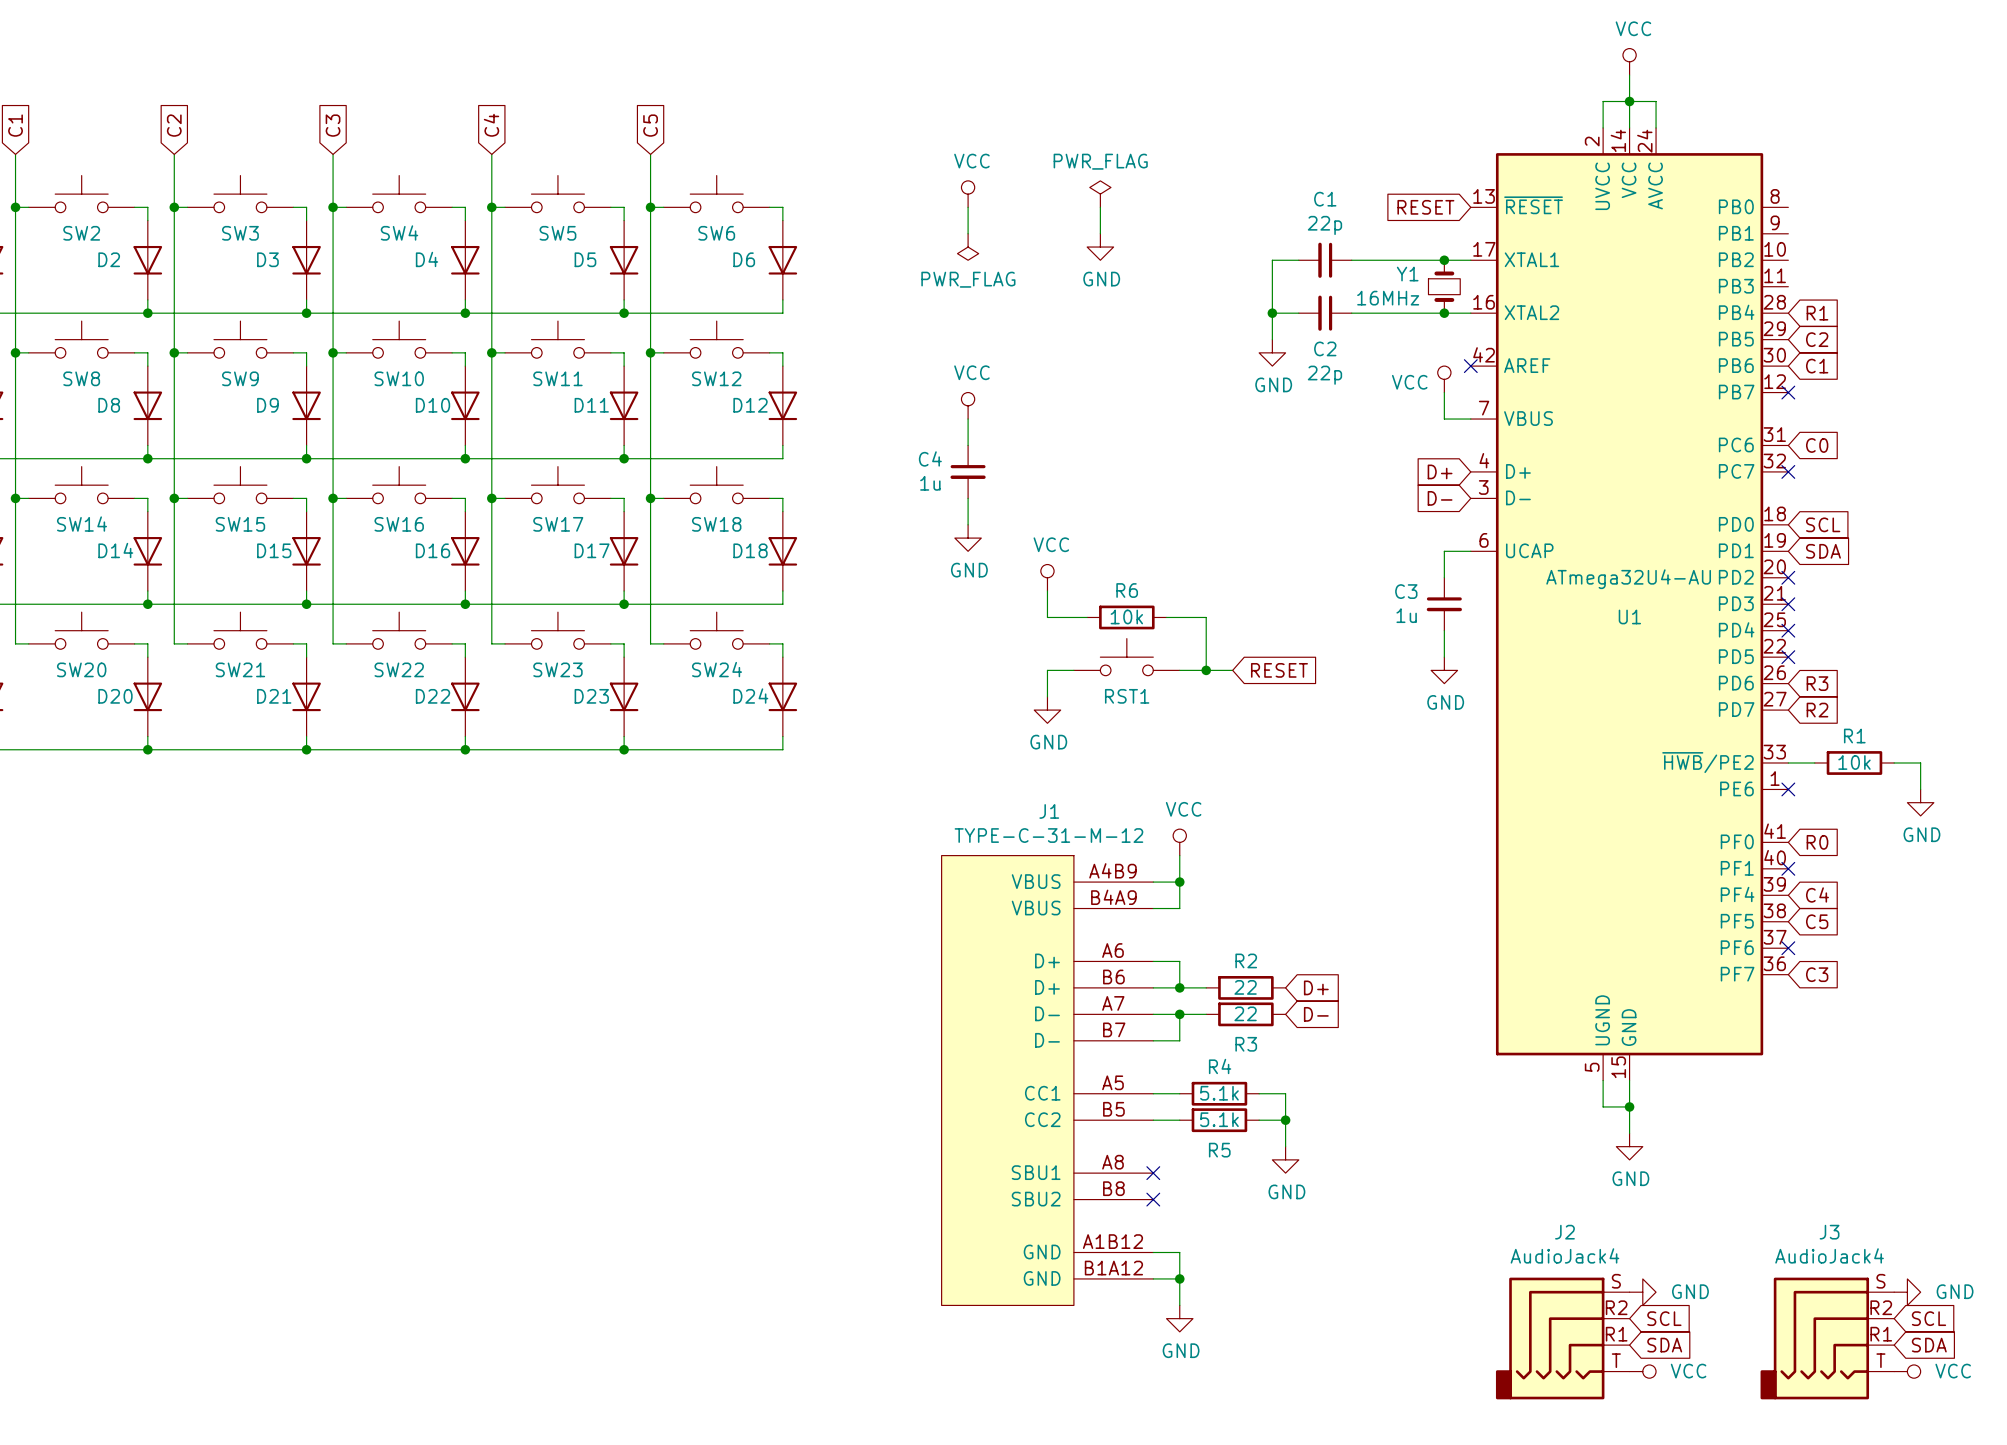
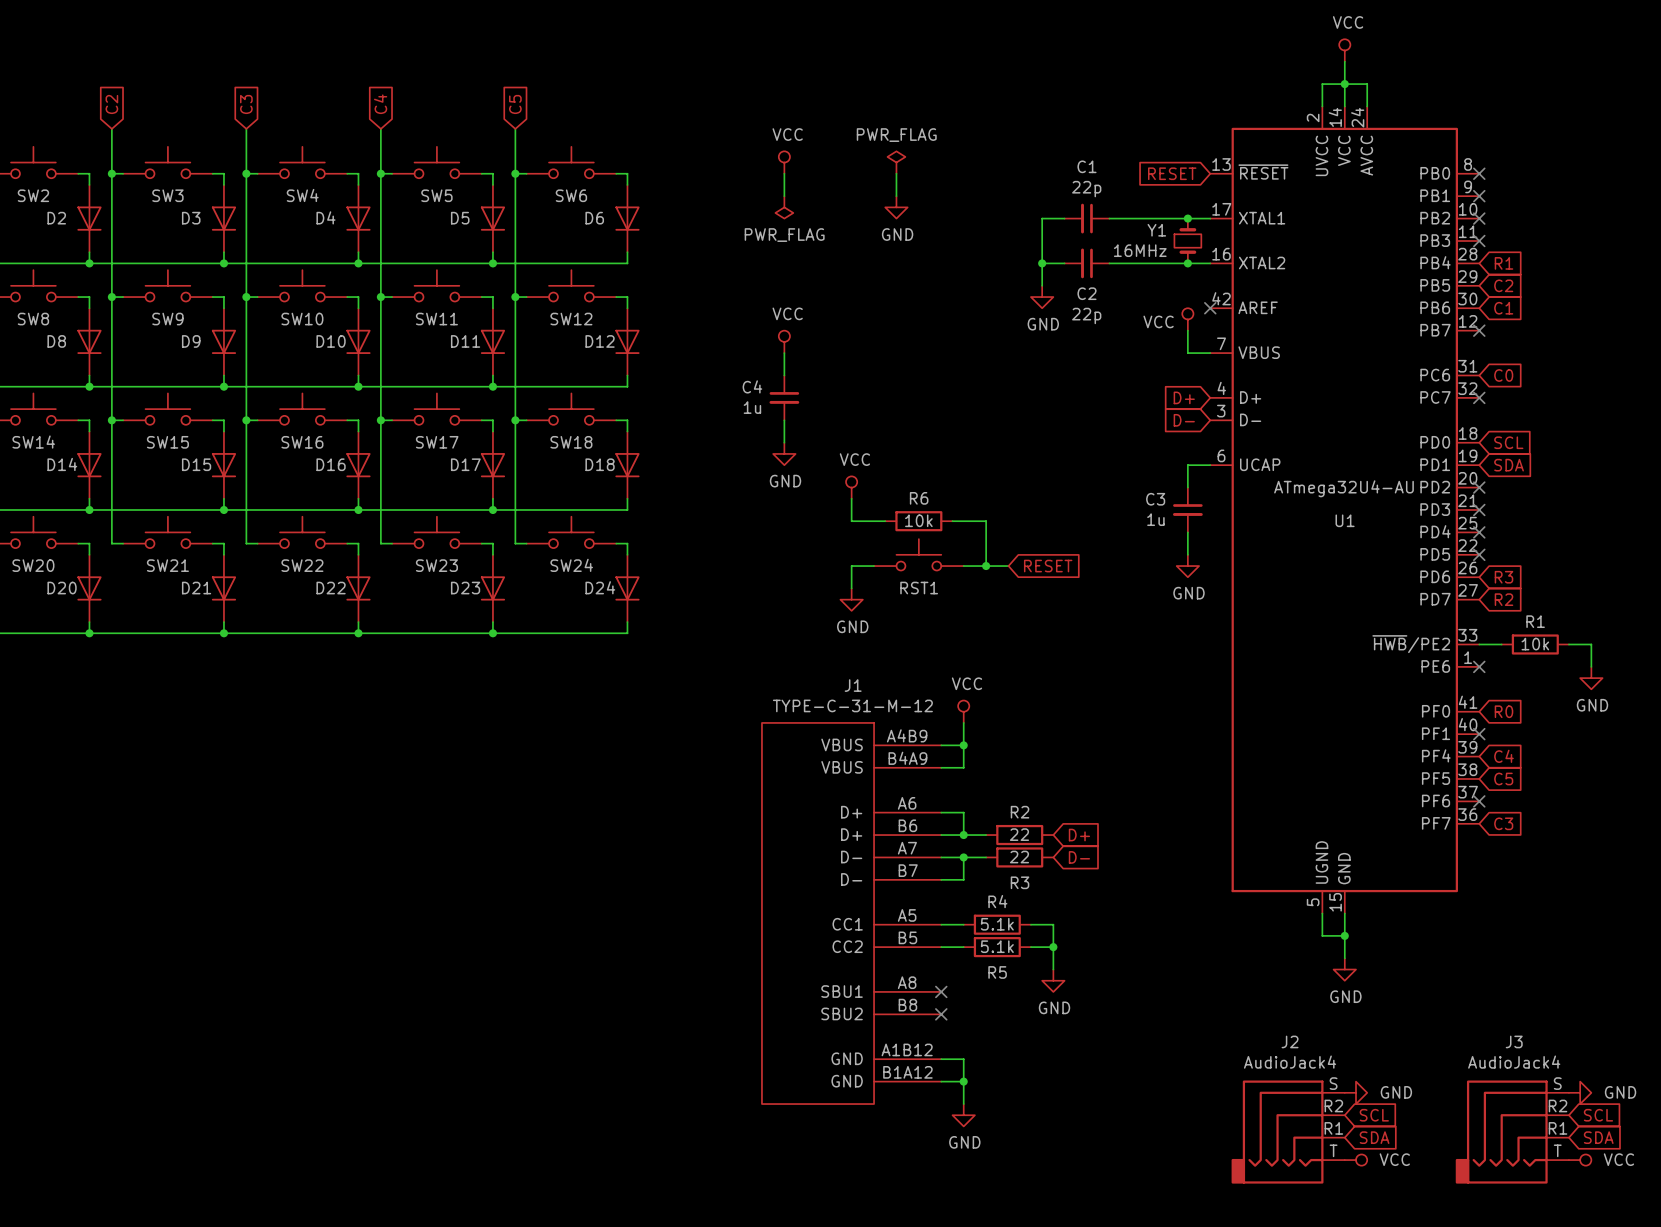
no-connect mark: none -> (1479, 173)
no-connect mark: none -> (1479, 196)
no-connect mark: none -> (1479, 218)
no-connect mark: none -> (1479, 240)

